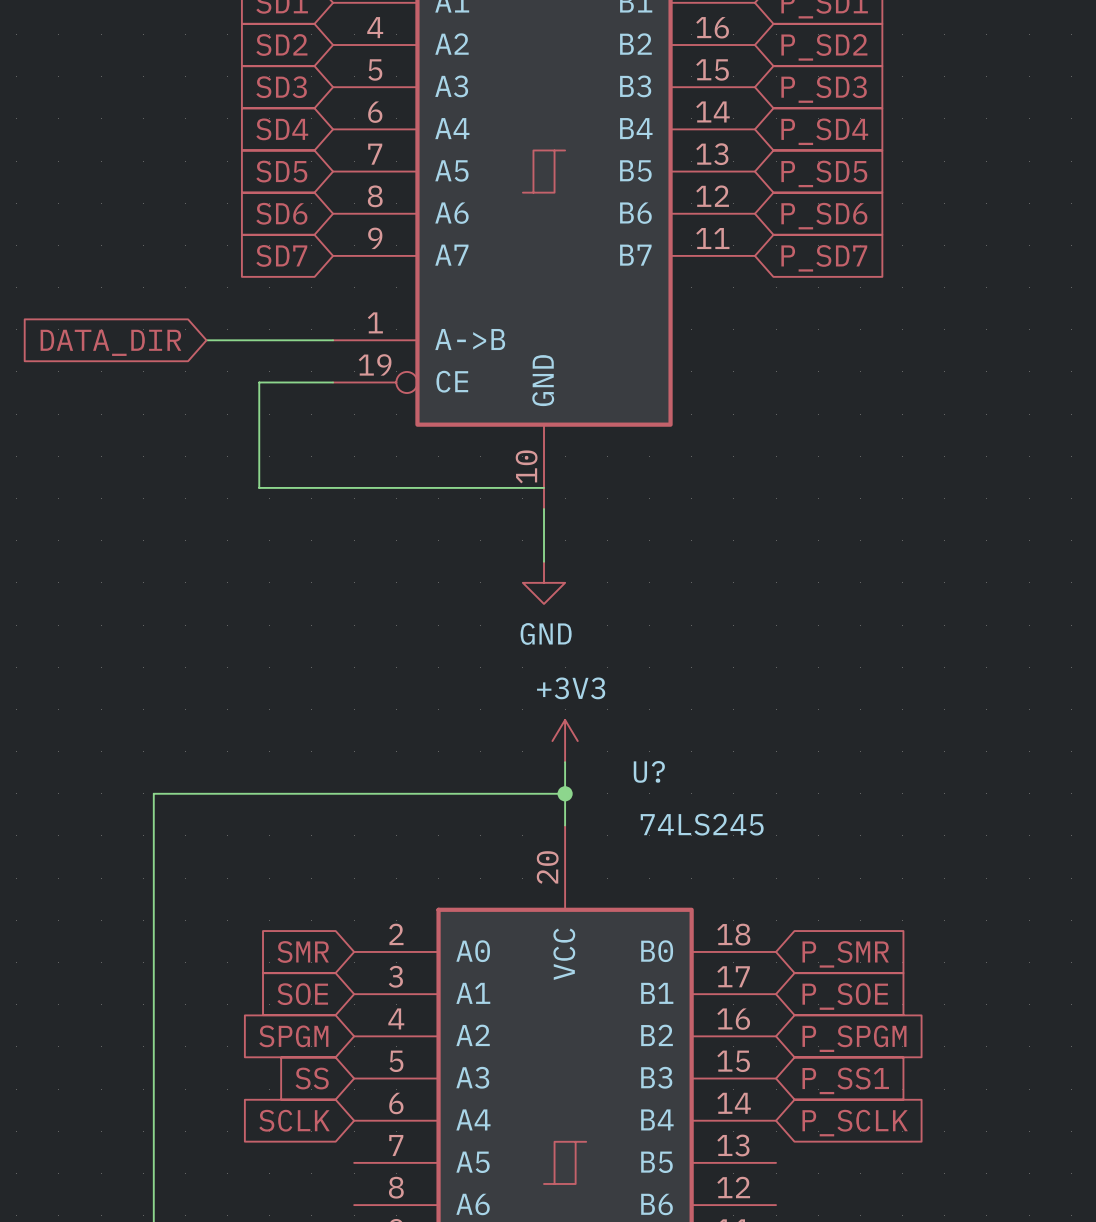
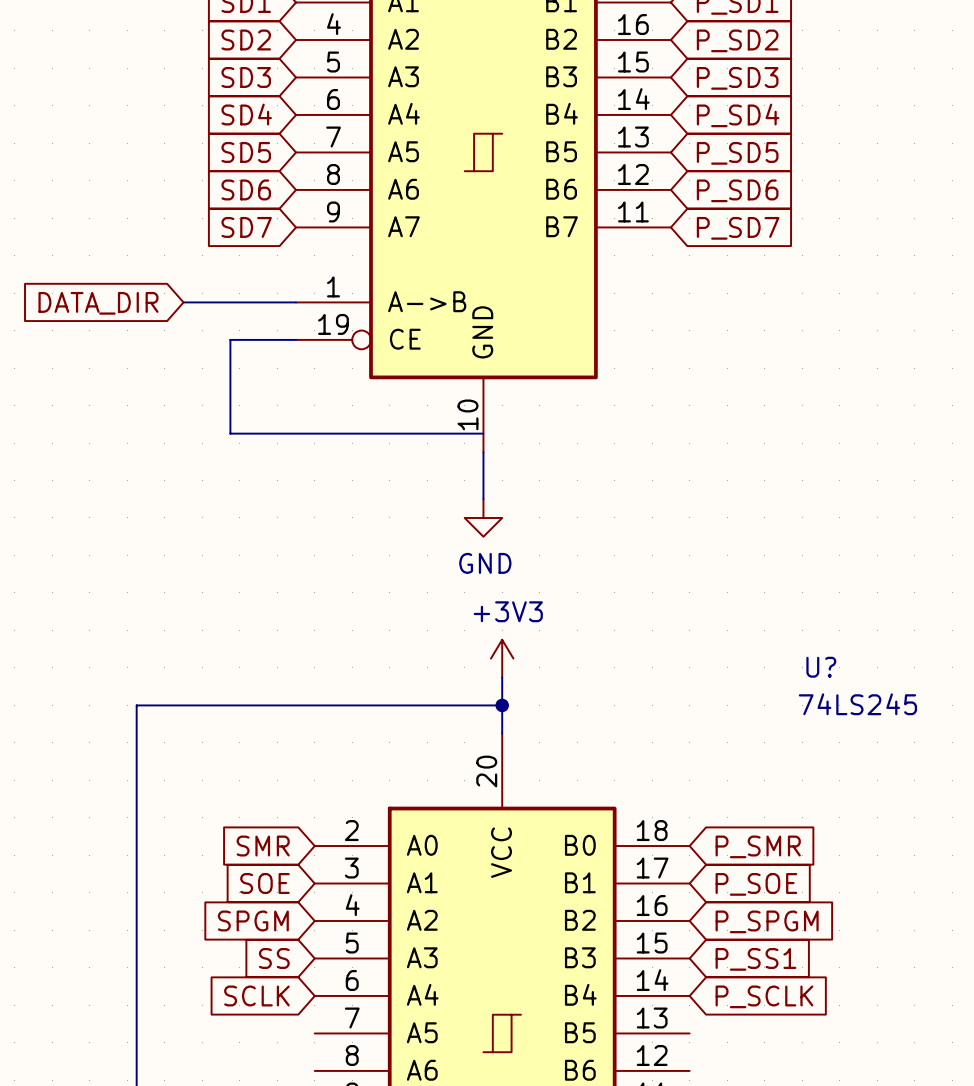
U? name position: U? (649, 771) -> U? (821, 667)
U? value position: 74LS245 (702, 824) -> 74LS245 (857, 704)

